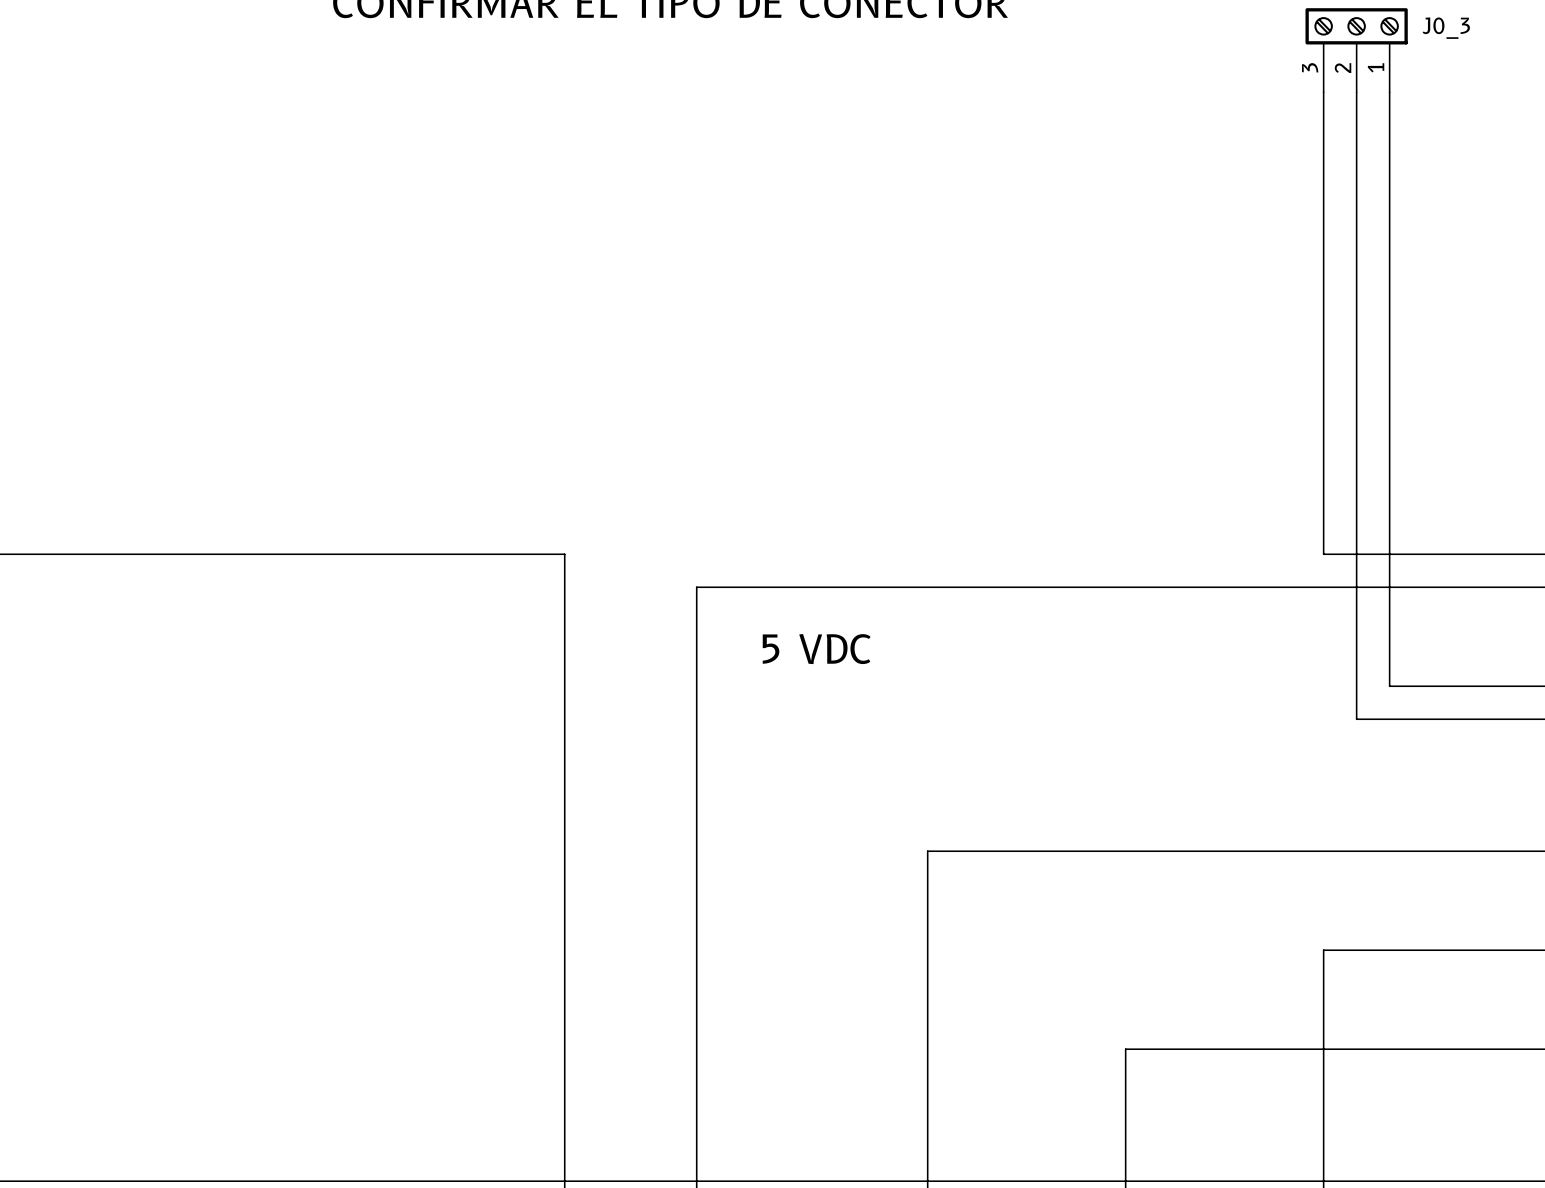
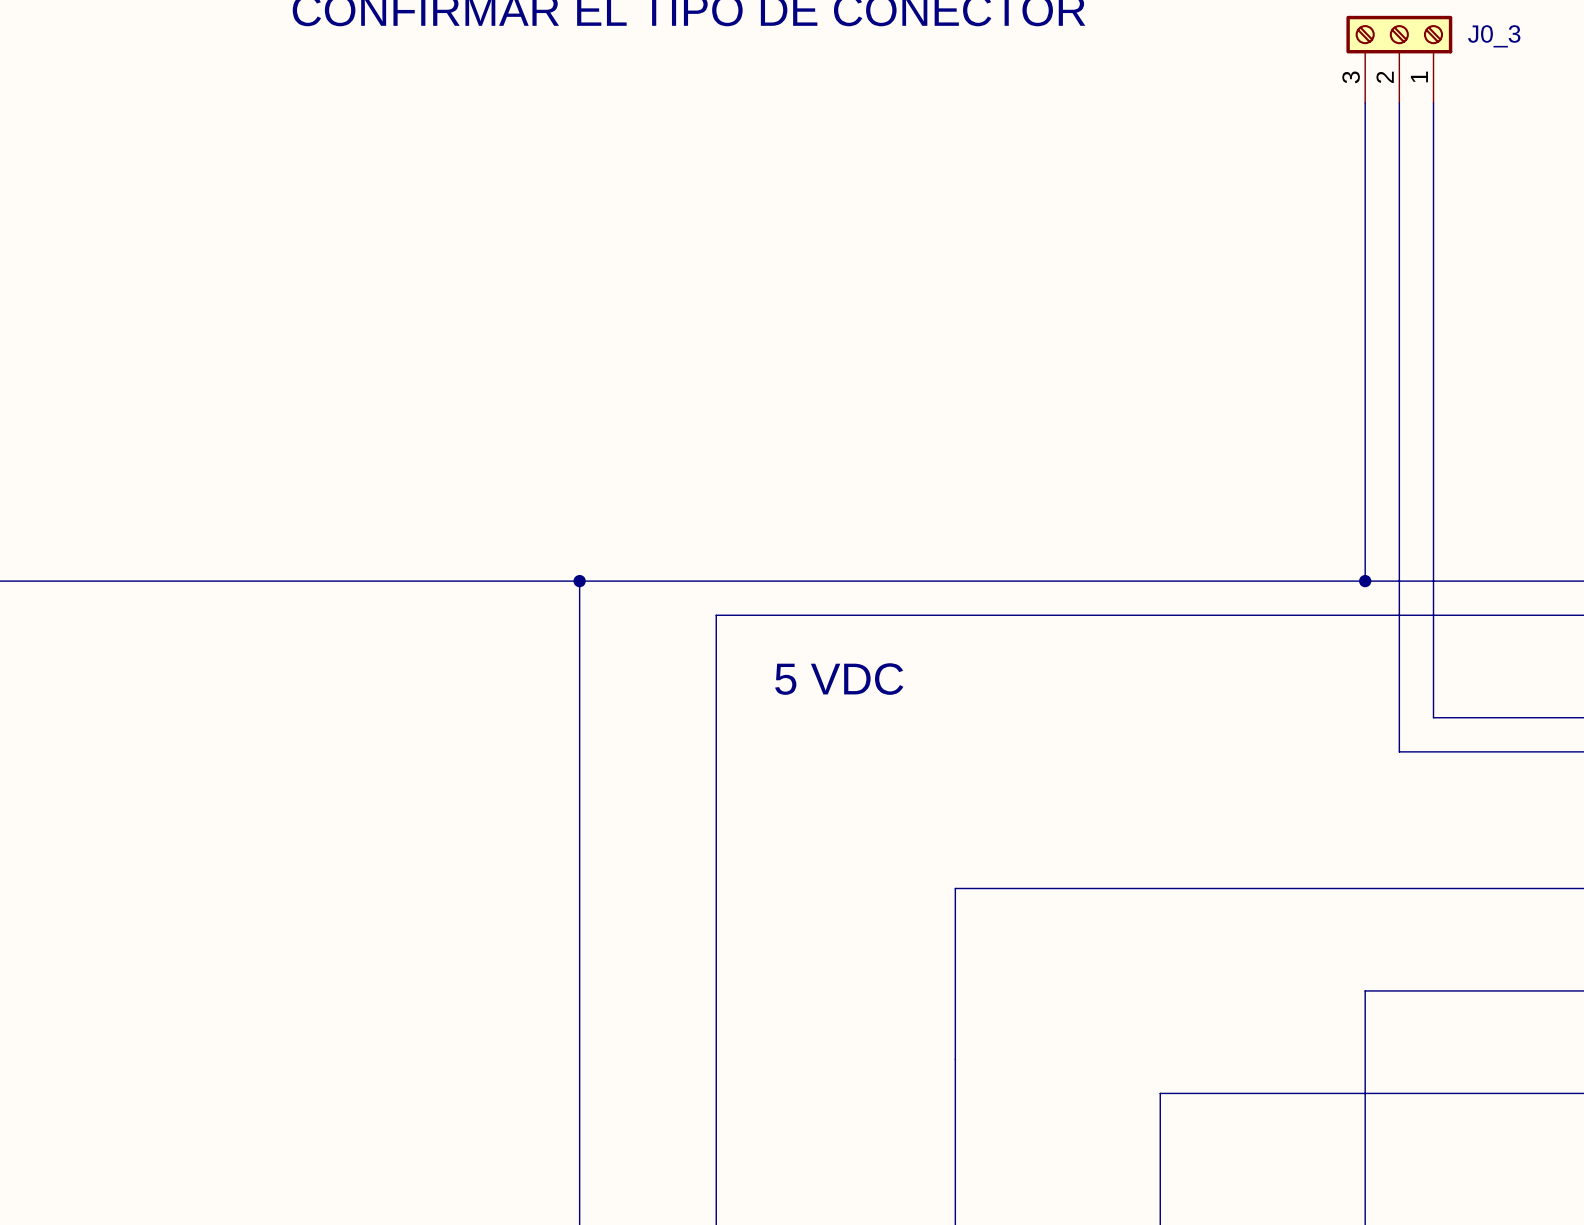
wire: none -> (579, 581) (1365, 581)
junction: none -> (579, 581)
junction: none -> (1365, 581)

